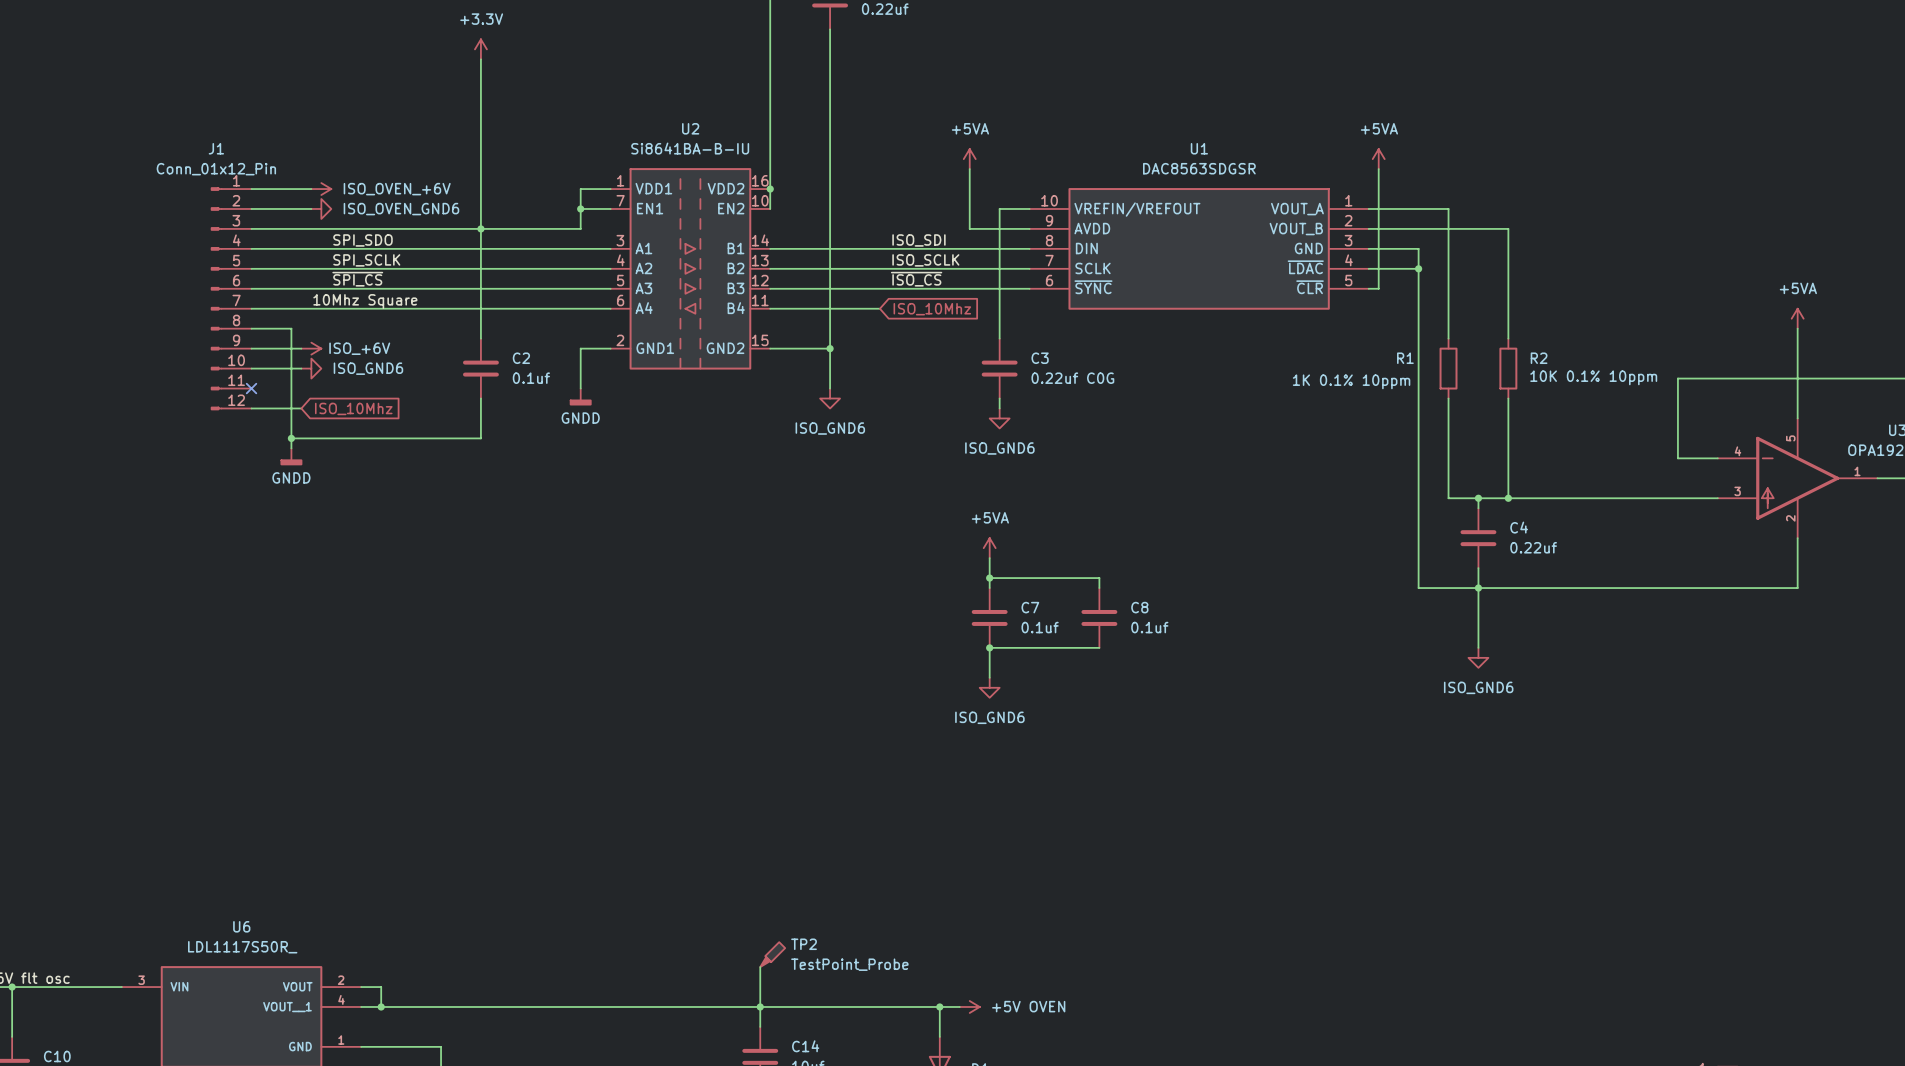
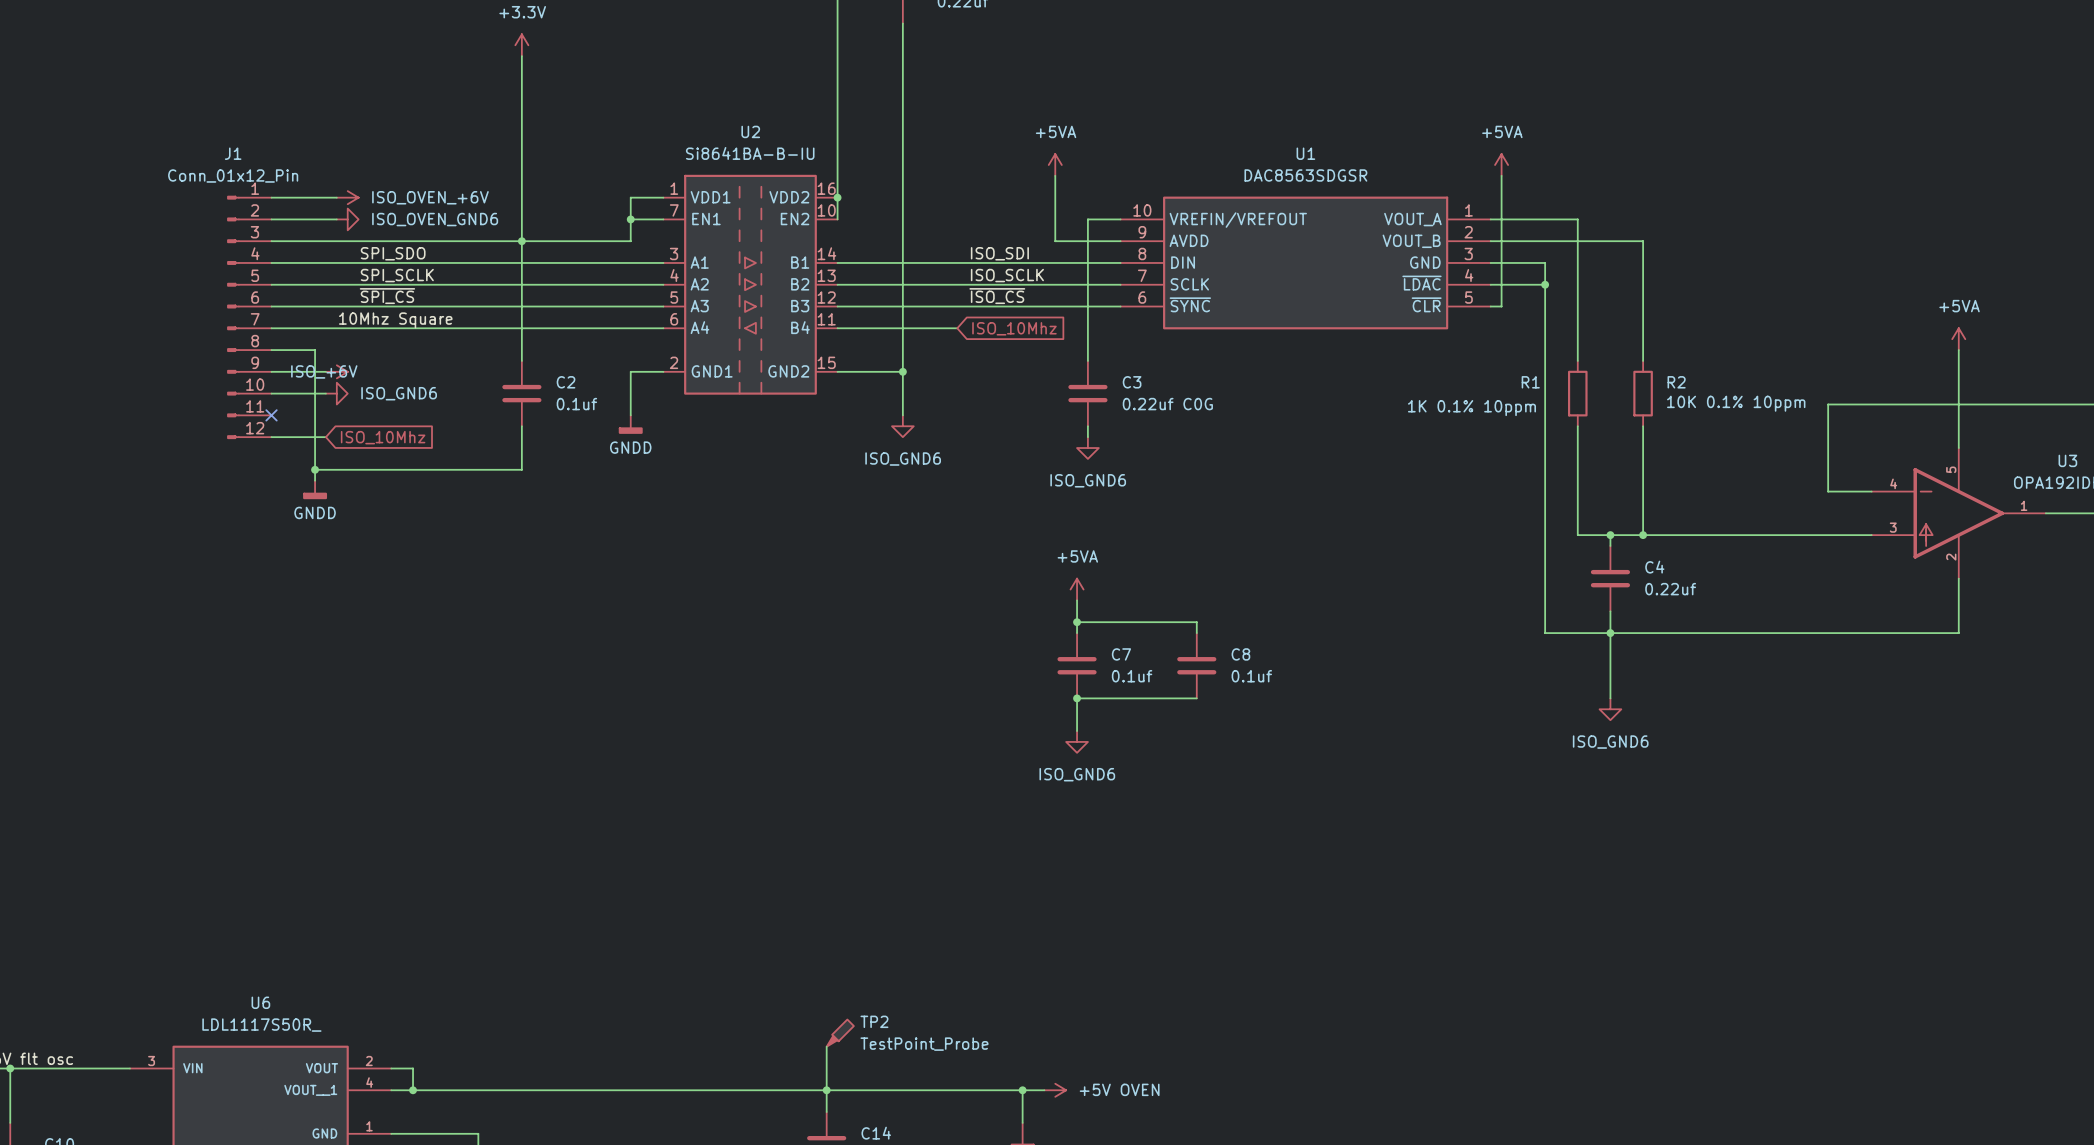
power symbol text position: ISO_+6V (359, 348) -> ISO_+6V (324, 371)

